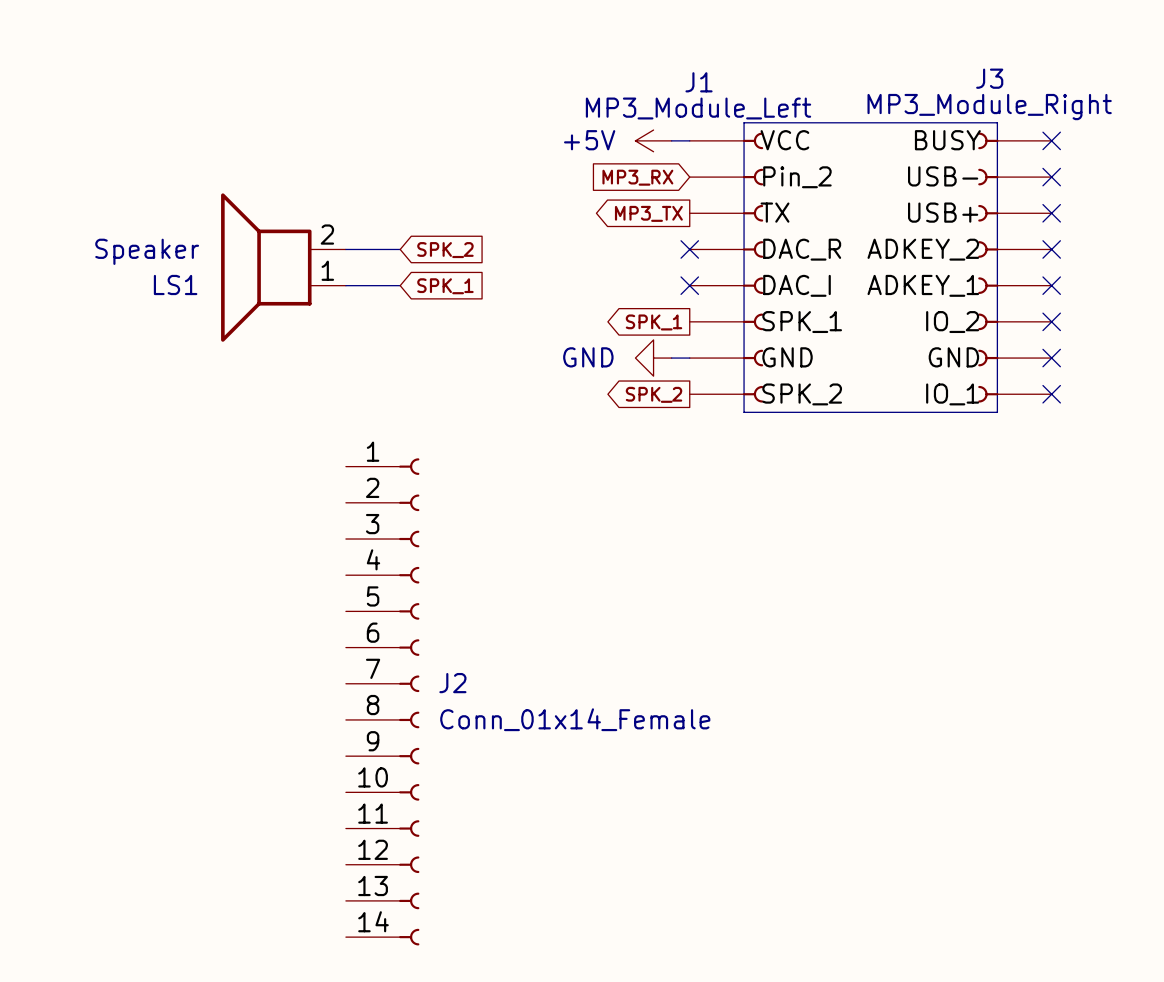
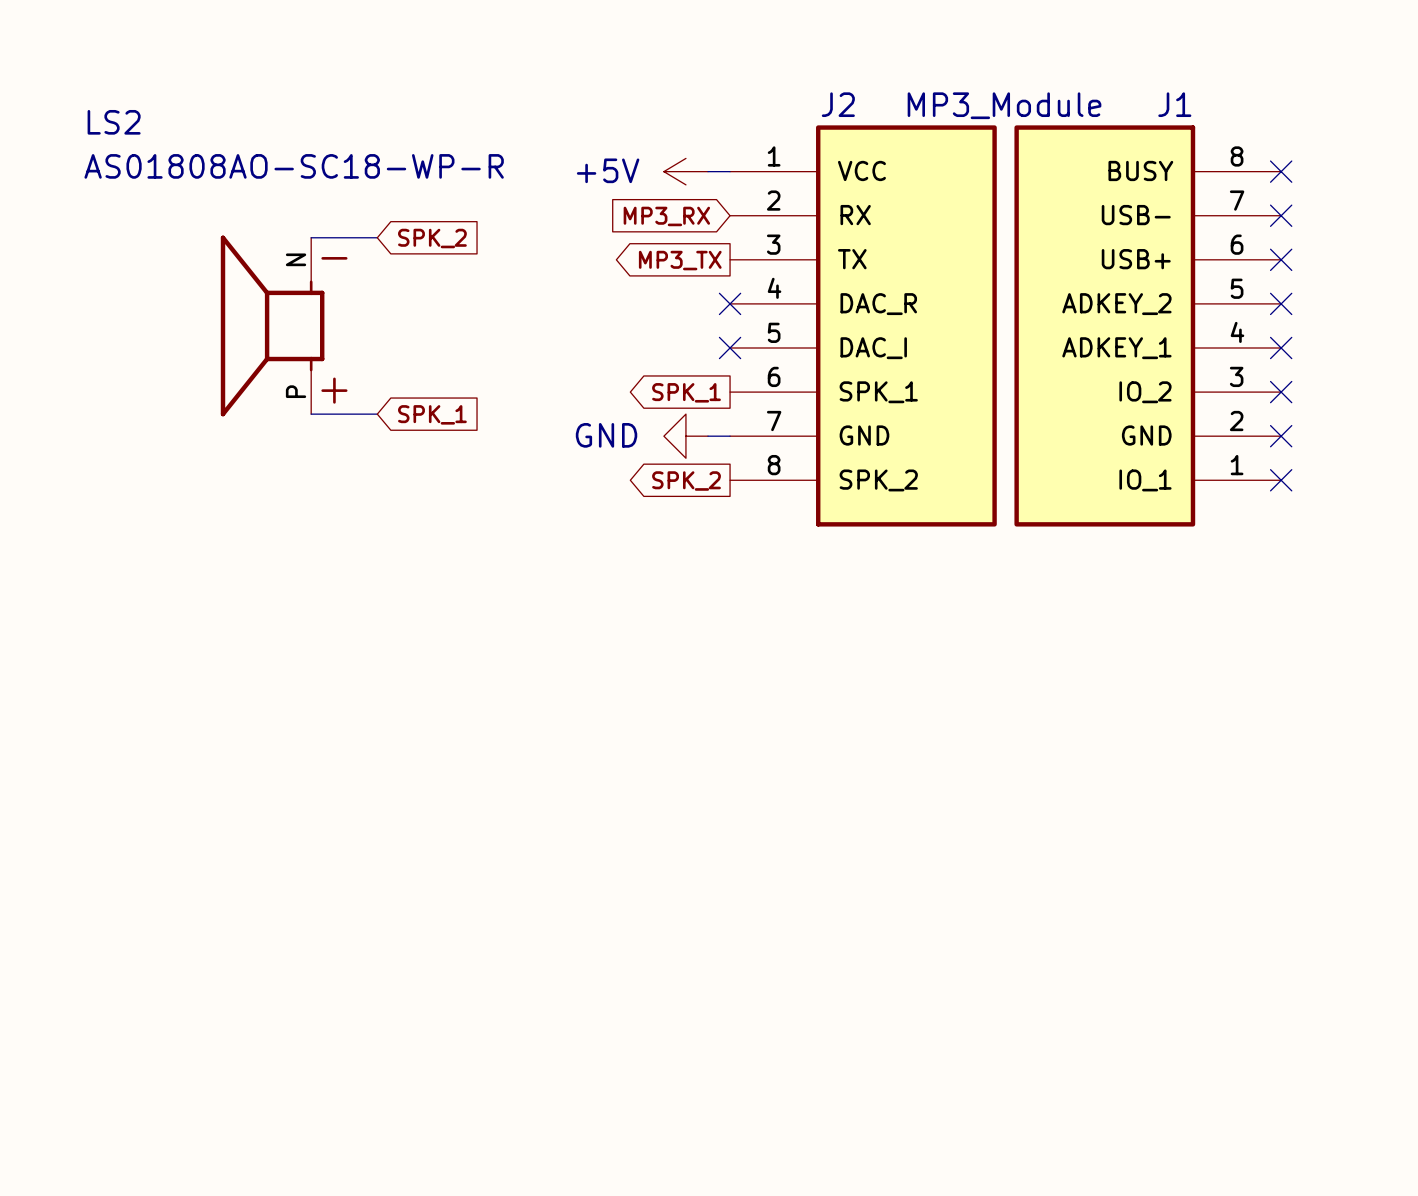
J1 name position: J1 (699, 82) -> J1 (1174, 104)
J1 value: MP3_Module_Left (698, 108) -> none
line: (744, 122) (997, 122) (997, 412) (744, 412) (744, 122) -> none
J1 symbol: [689, 132, 764, 403] -> [1014, 125, 1282, 527]
power symbol position: +5V (653, 140) -> +5V (685, 171)
global label position: MP3_RX (637, 177) -> MP3_RX (666, 216)
global label position: MP3_TX (648, 213) -> MP3_TX (680, 260)
wire: (345, 249) (400, 249) -> (311, 237) (377, 237)
no-connect mark: none -> (730, 303)
no-connect mark: (689, 249) -> none
global label position: SPK_2 (445, 250) -> SPK_2 (432, 238)
LS2: none -> AS01808AO-SC18-WP-R (272, 325)
LS1: Speaker (283, 267) -> none
J3: MP3_Module_Right (1014, 267) -> none
wire: (345, 285) (400, 285) -> (311, 414) (377, 414)
no-connect mark: none -> (730, 348)
no-connect mark: (689, 285) -> none
global label: SPK_1 (445, 286) -> none
global label position: SPK_1 (654, 322) -> SPK_1 (686, 392)
global label: none -> SPK_1 (432, 414)
power symbol position: GND (653, 358) -> GND (685, 436)
global label position: SPK_2 (654, 394) -> SPK_2 (686, 481)
J2 symbol: [345, 458, 420, 946] -> [730, 125, 997, 527]
J2 name position: J2 (452, 683) -> J2 (838, 104)
J2 value: Conn_01x14_Female (575, 719) -> MP3_Module (1004, 105)

